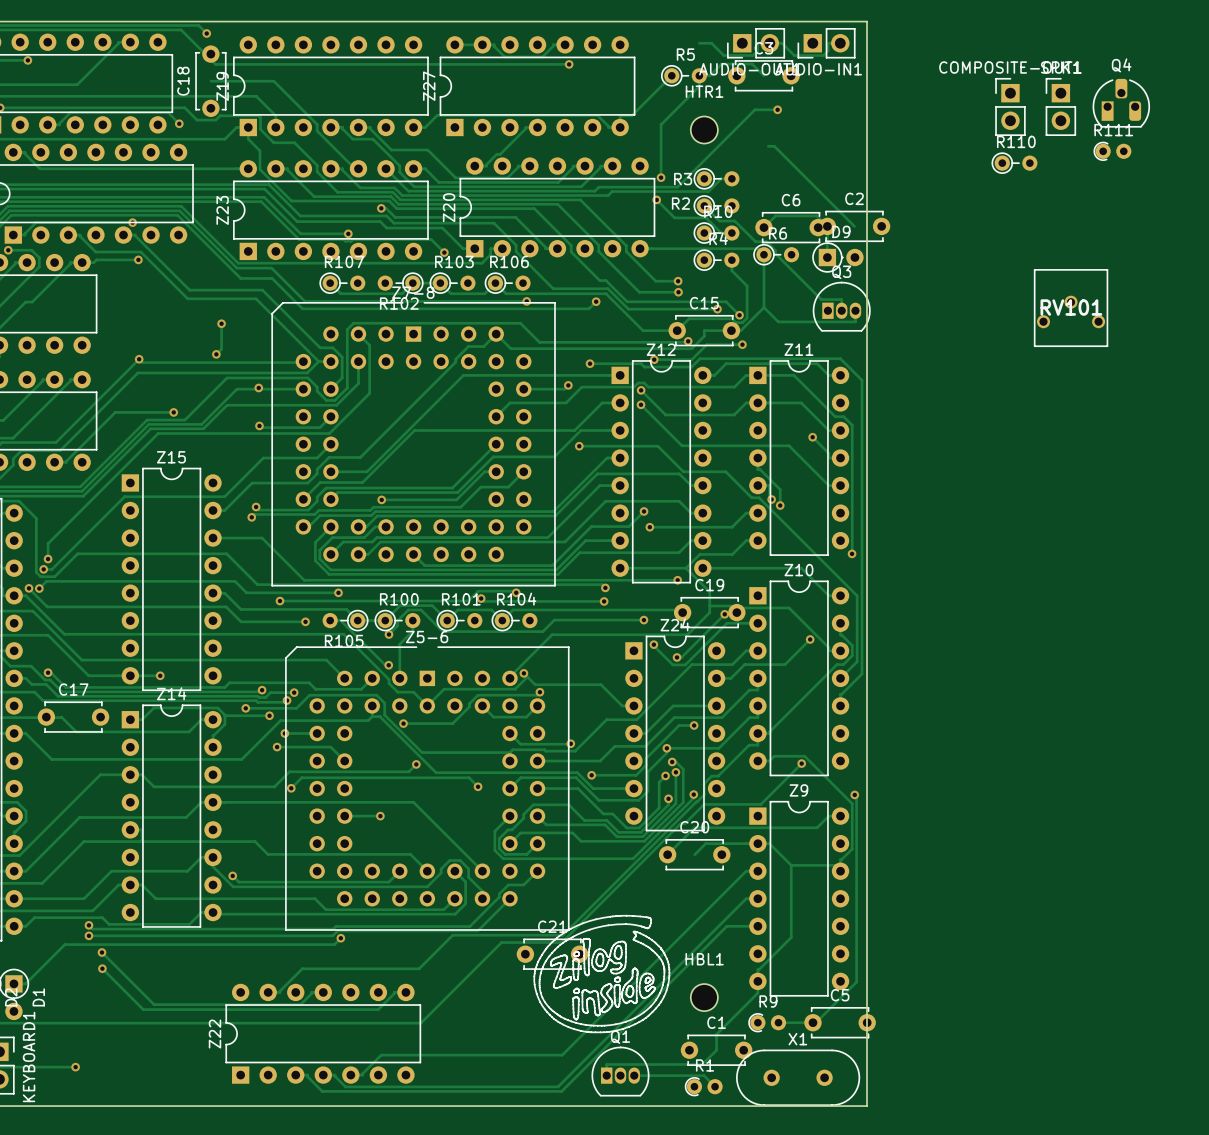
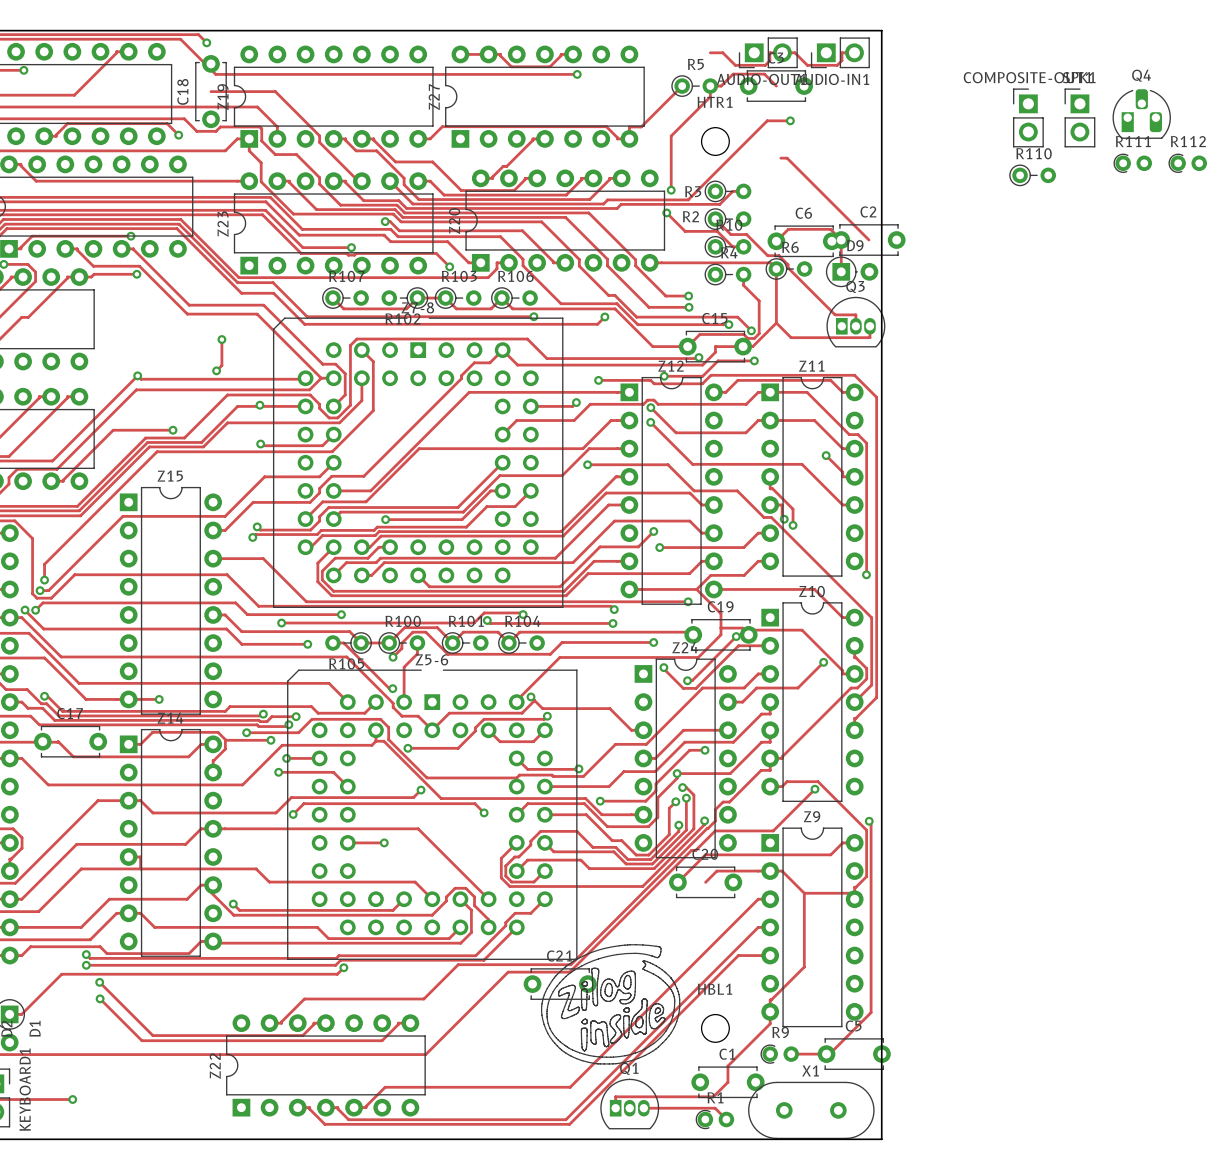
R112: none -> (1187, 163)
RV101: (1071, 308) -> none

